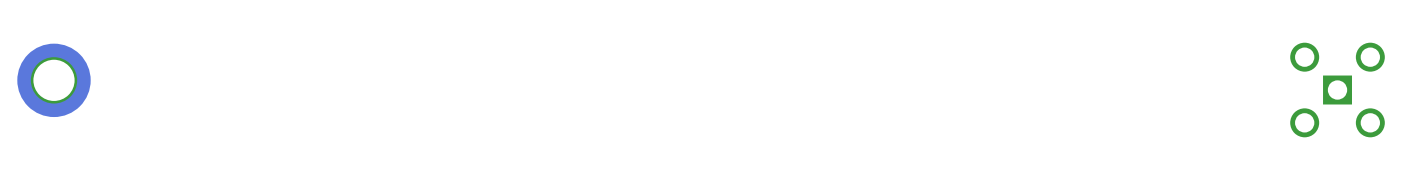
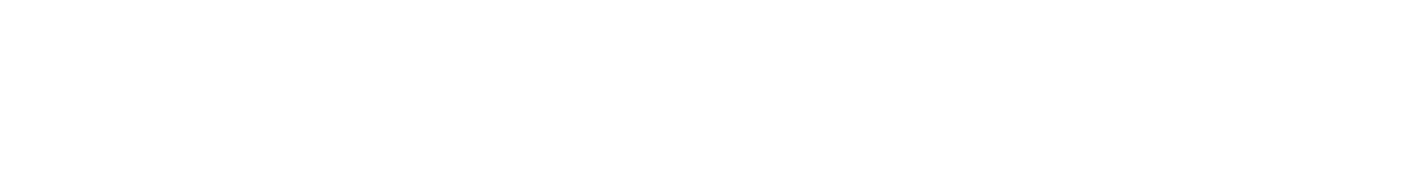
part: (54, 80) -> none
part: (1337, 90) -> none

